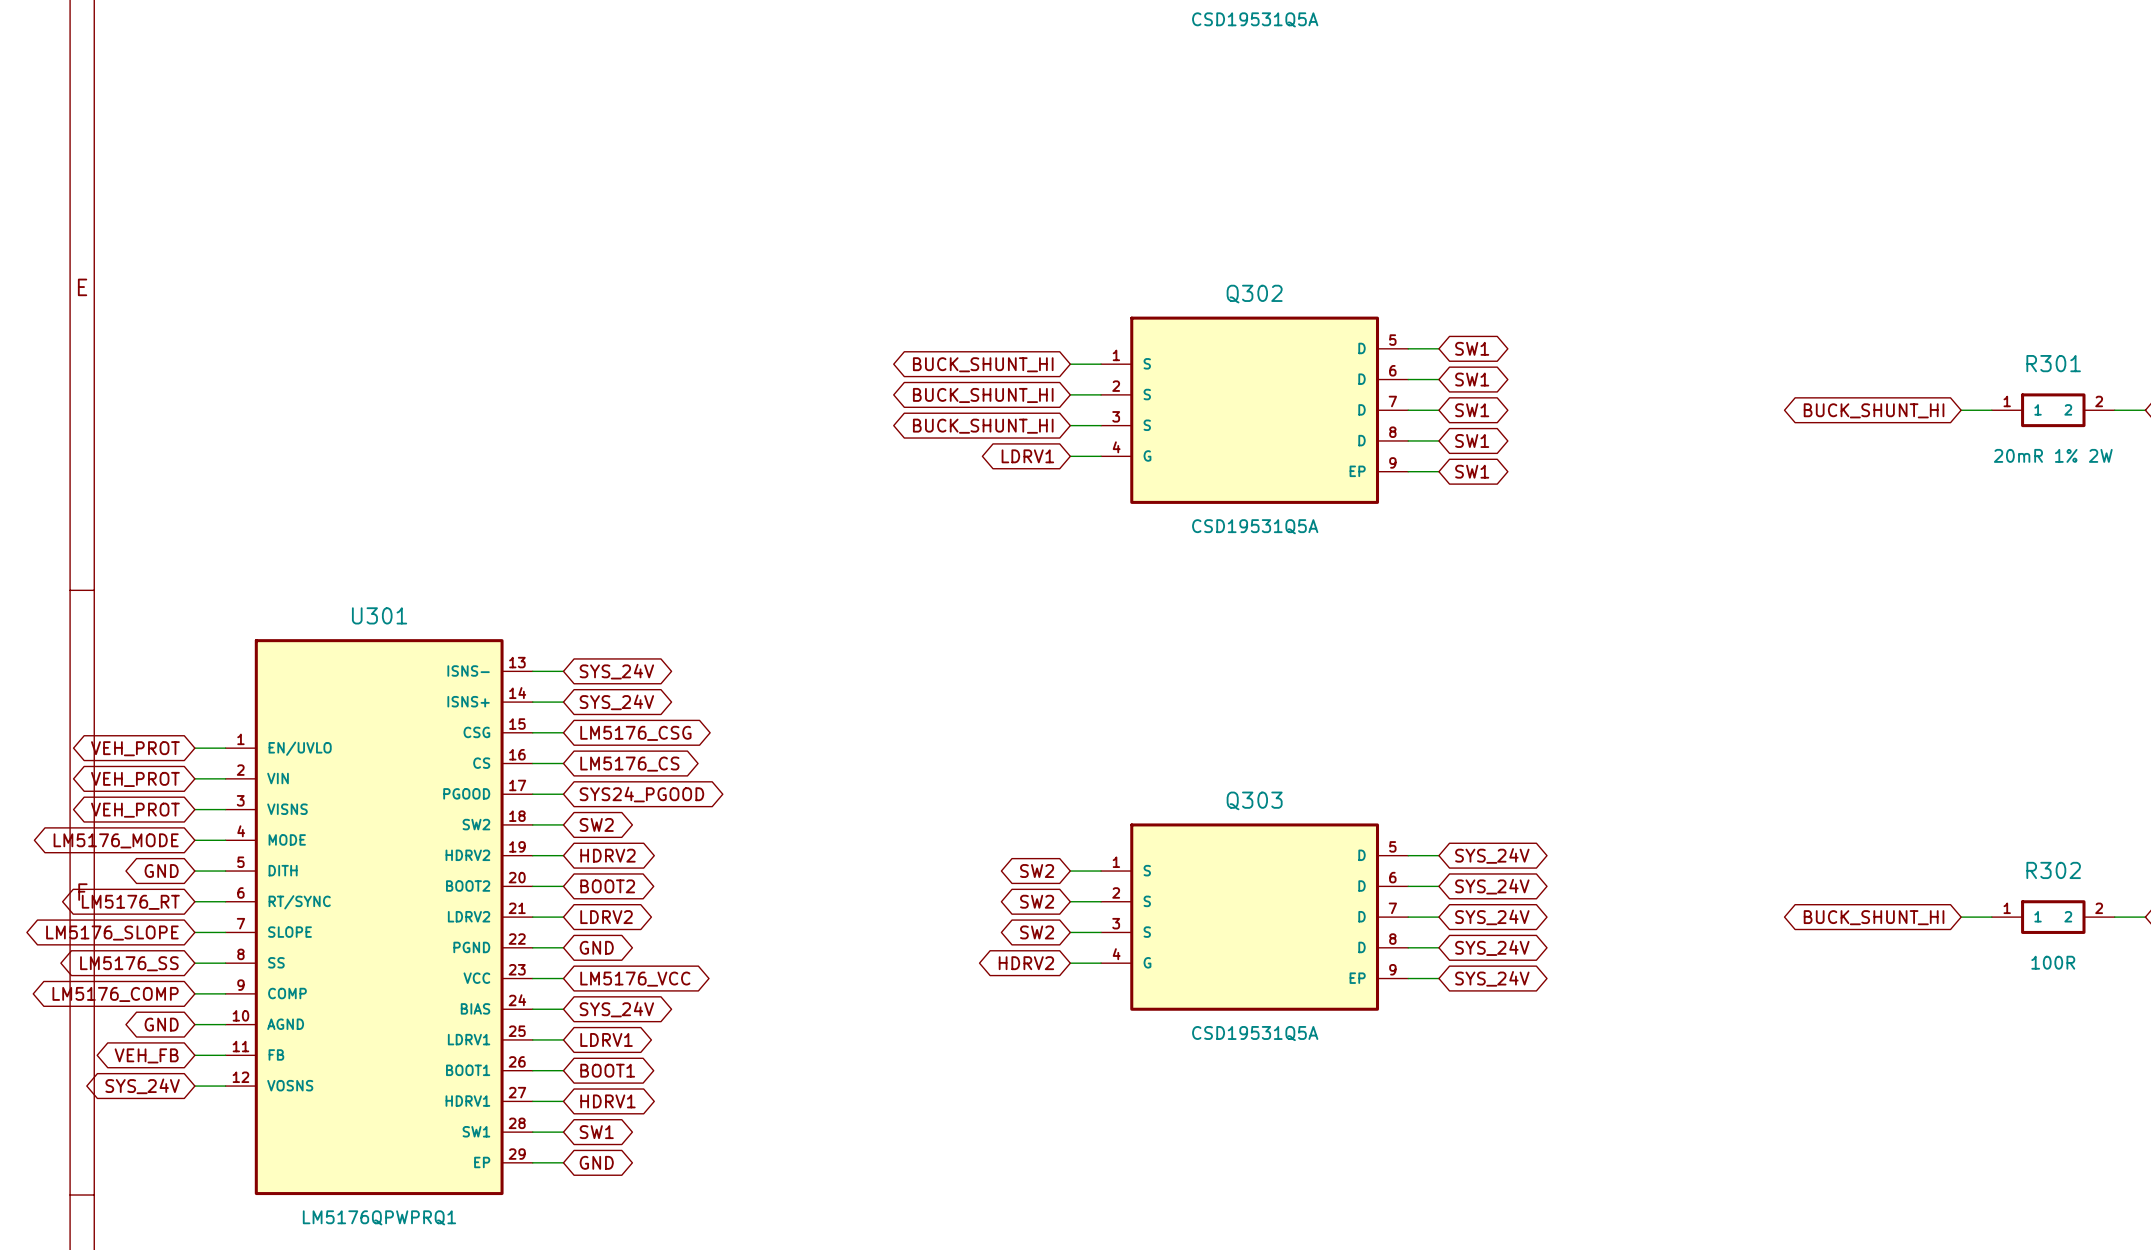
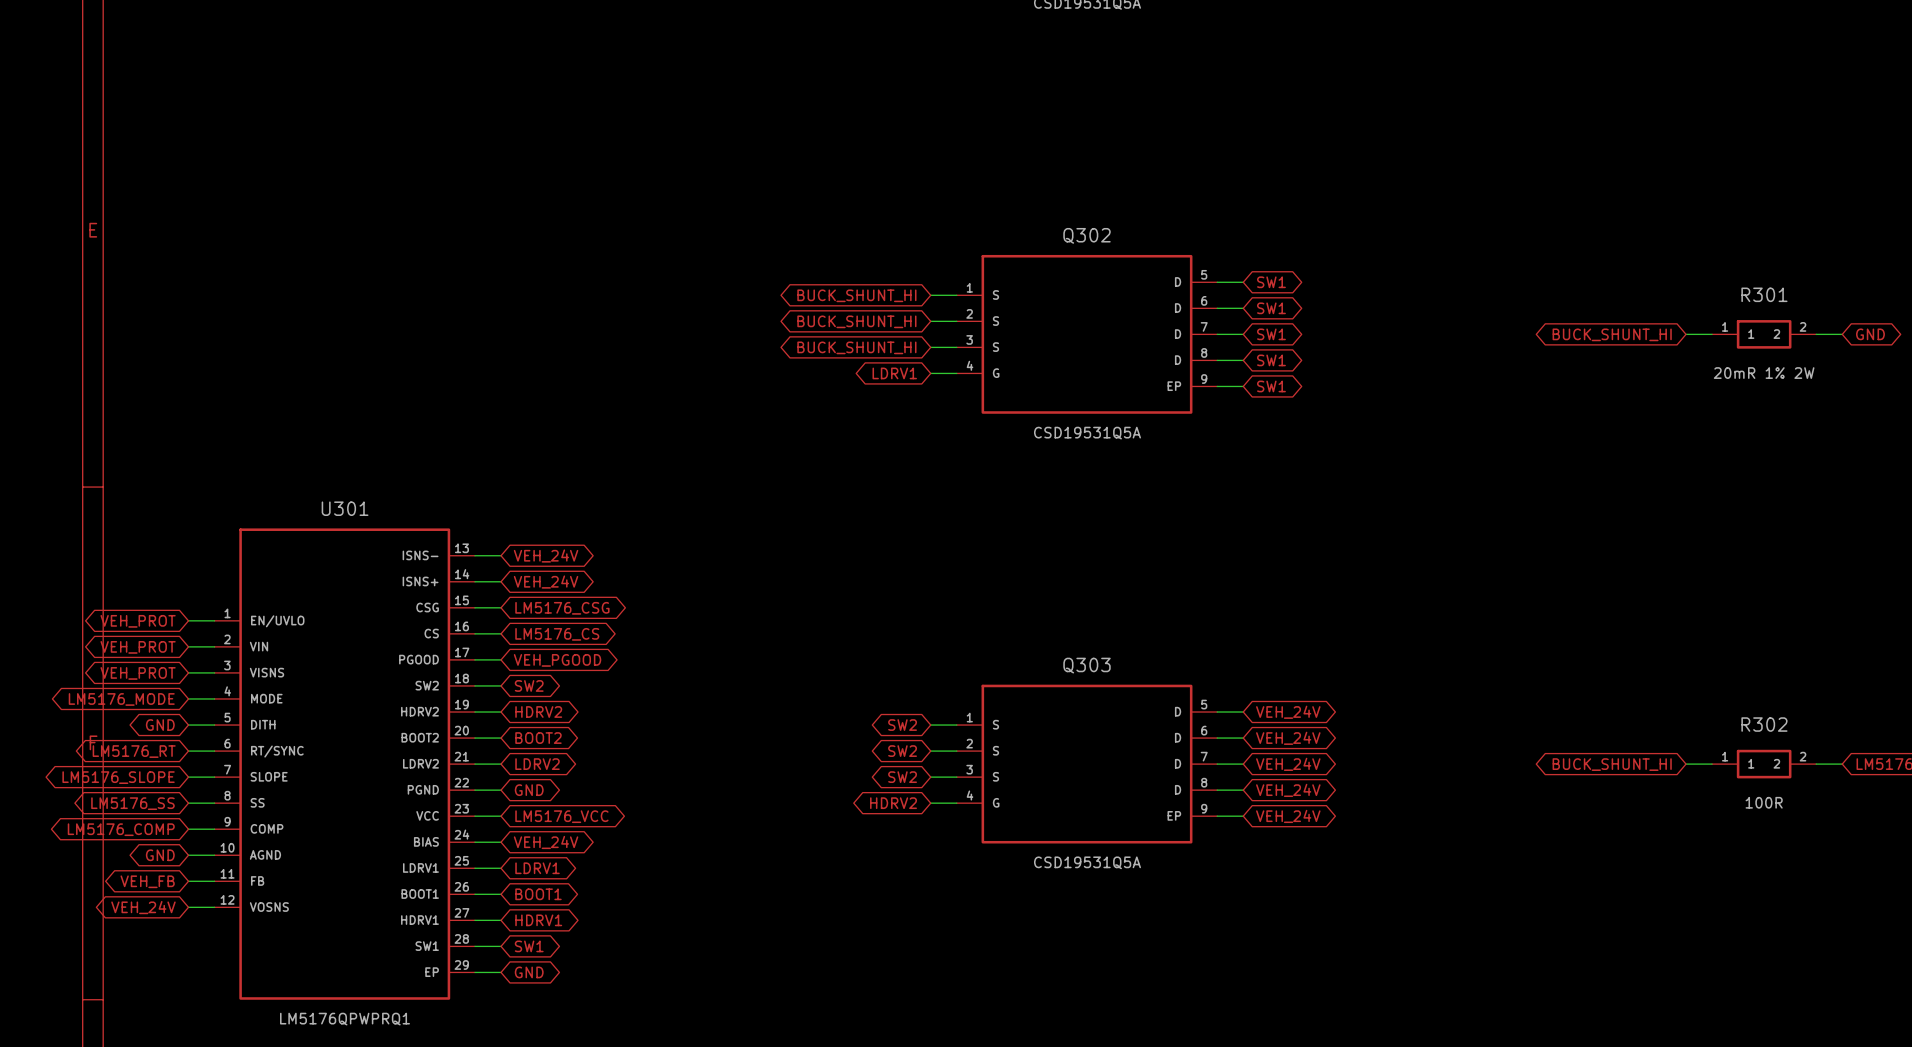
global label: SYS_24V (616, 671) -> VEH_24V (546, 555)
global label: SYS_24V (616, 702) -> VEH_24V (546, 582)
global label: SYS24_PGOOD (641, 794) -> VEH_PGOOD (557, 660)
global label: SYS_24V (1492, 855) -> VEH_24V (1288, 712)
global label: SYS_24V (1492, 886) -> VEH_24V (1288, 738)
global label: SYS_24V (1492, 917) -> VEH_24V (1288, 764)
global label: SYS_24V (1492, 948) -> VEH_24V (1288, 790)
global label: SYS_24V (1492, 978) -> VEH_24V (1288, 816)
global label: SYS_24V (616, 1009) -> VEH_24V (546, 842)
global label: SYS_24V (142, 1086) -> VEH_24V (143, 907)

